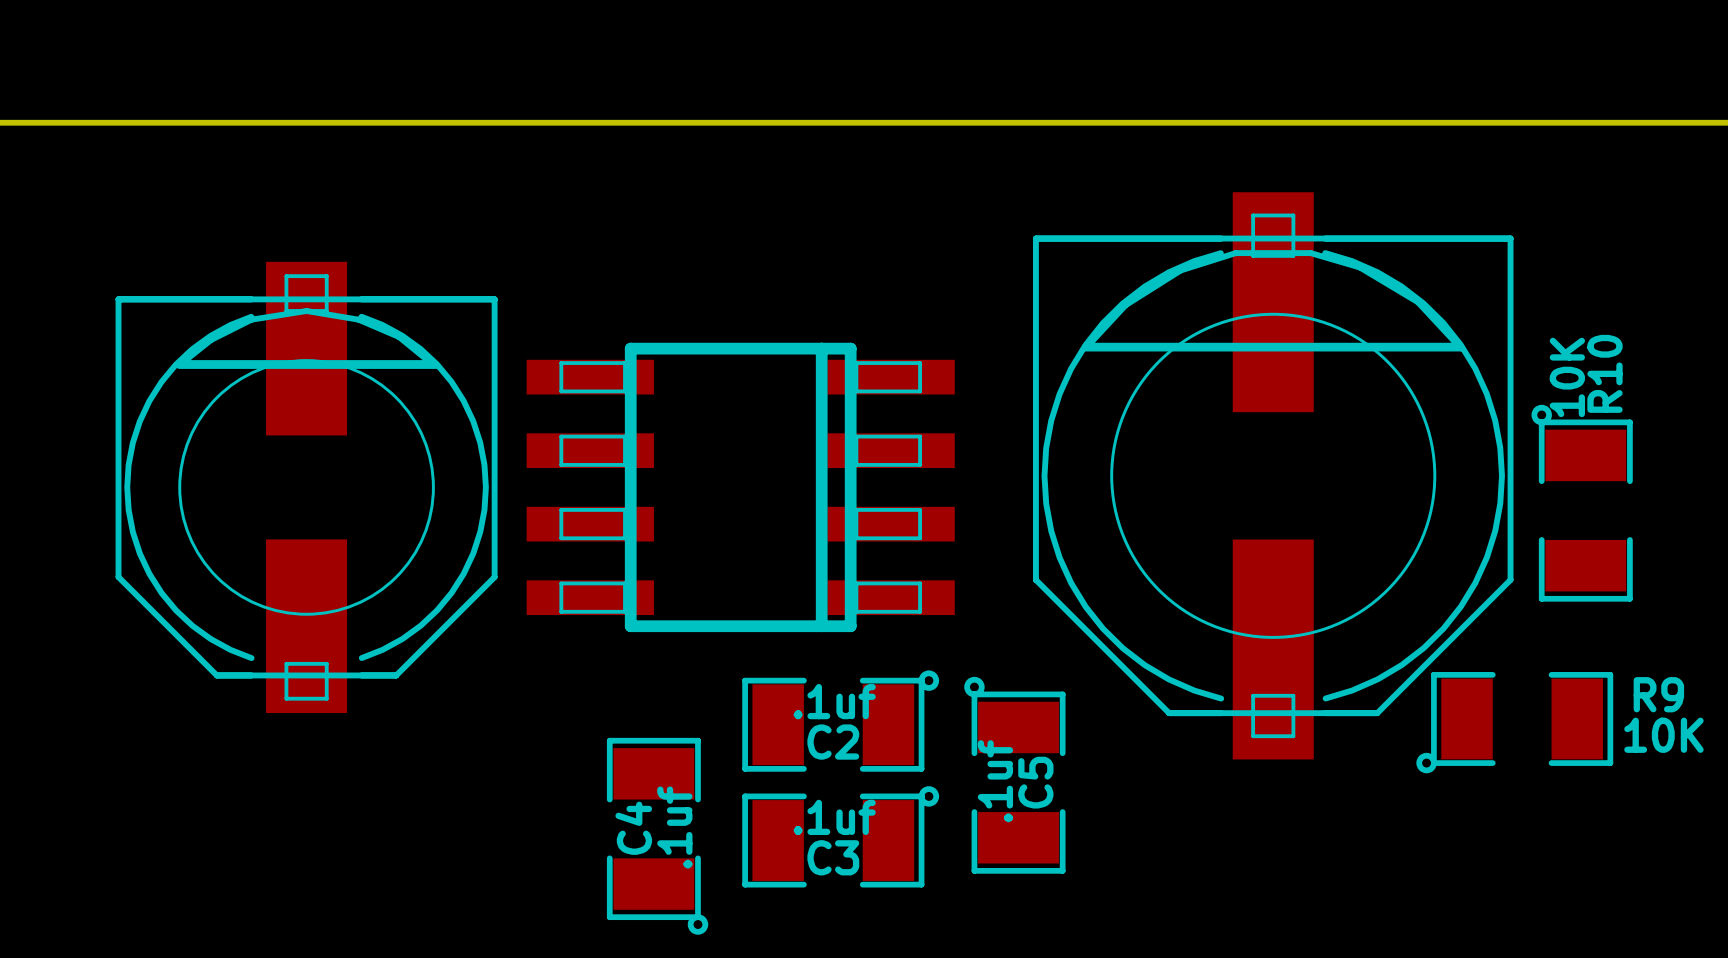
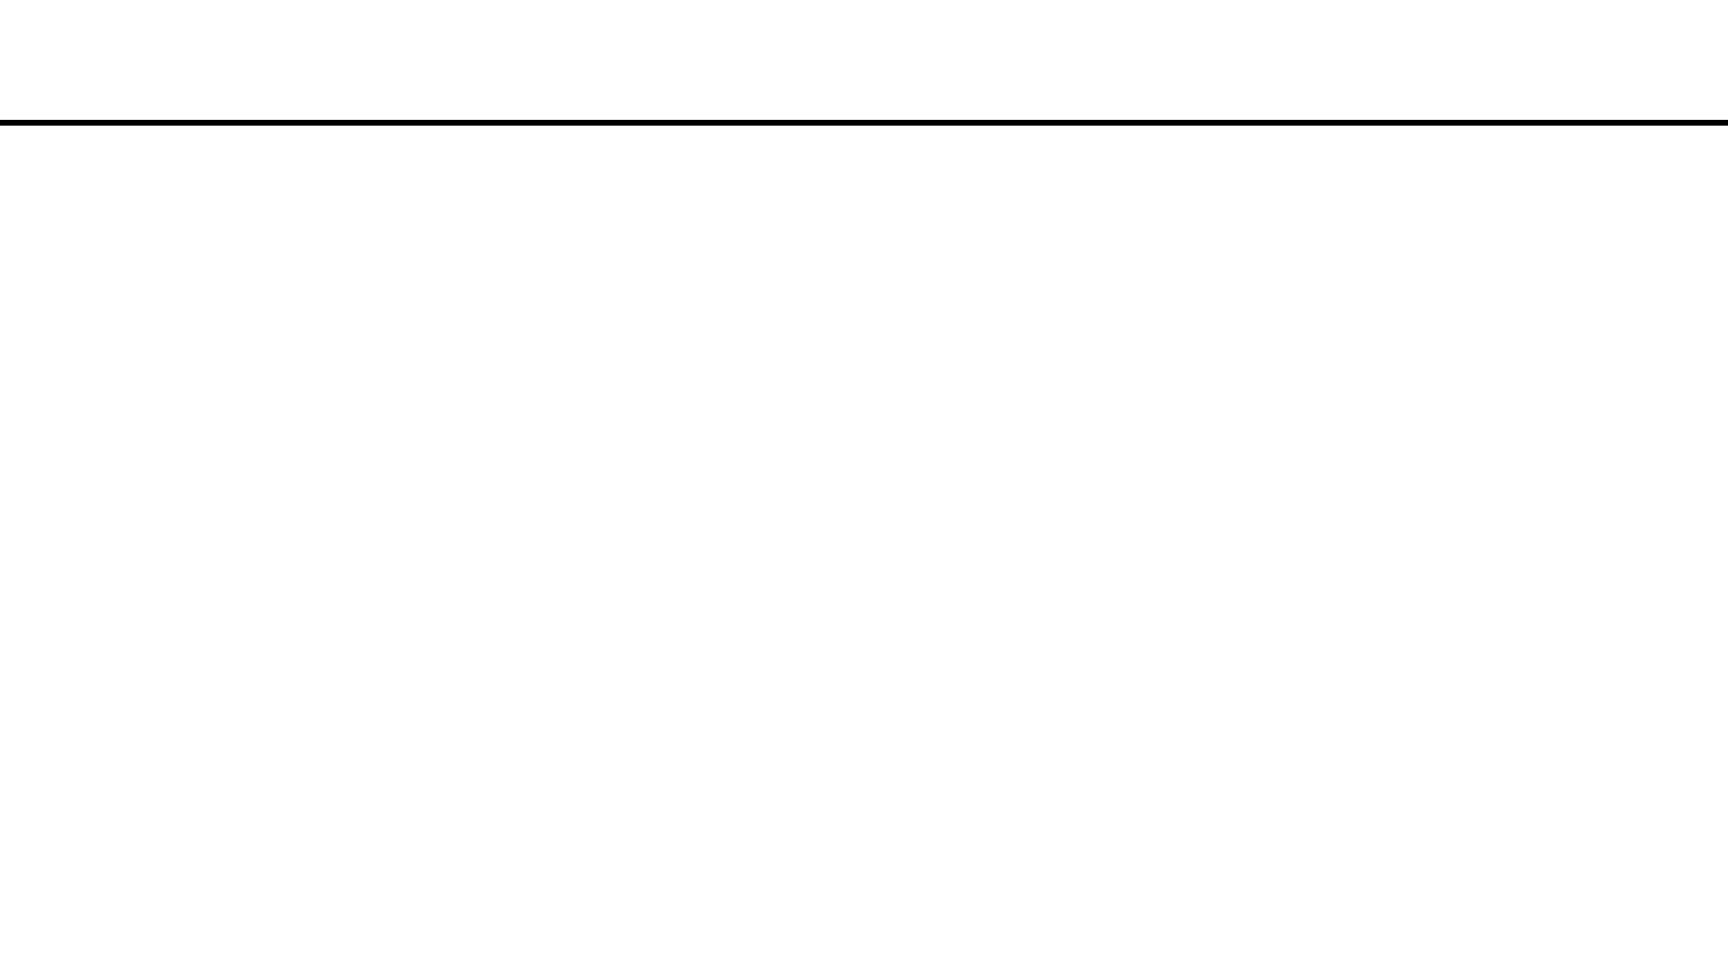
part: (1273, 475) -> none
part: (306, 487) -> none
part: (740, 487) -> none
R10: 10K (1582, 503) -> none
C2: .1uf (840, 721) -> none
R9: 10K (1514, 722) -> none
C5: .1uf (1014, 775) -> none
C4: .1uf (657, 836) -> none
C3: .1uf (840, 836) -> none

